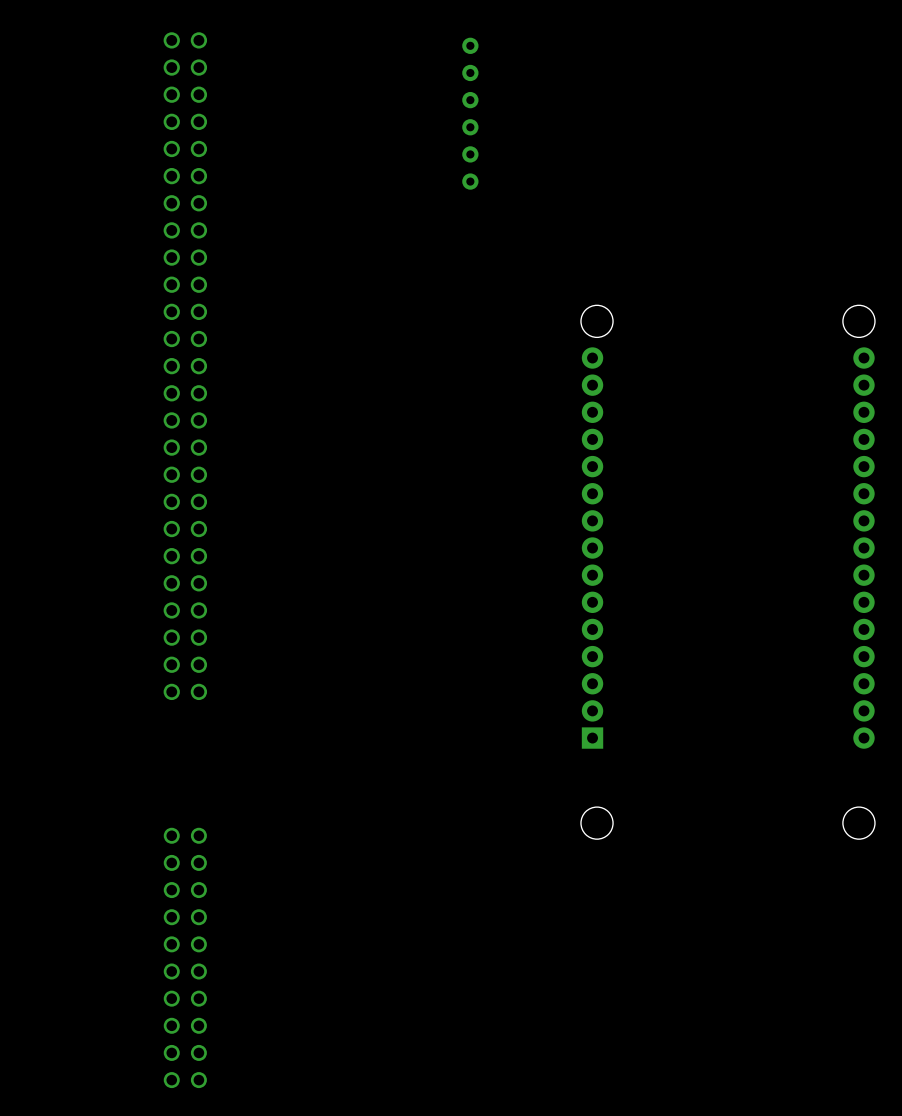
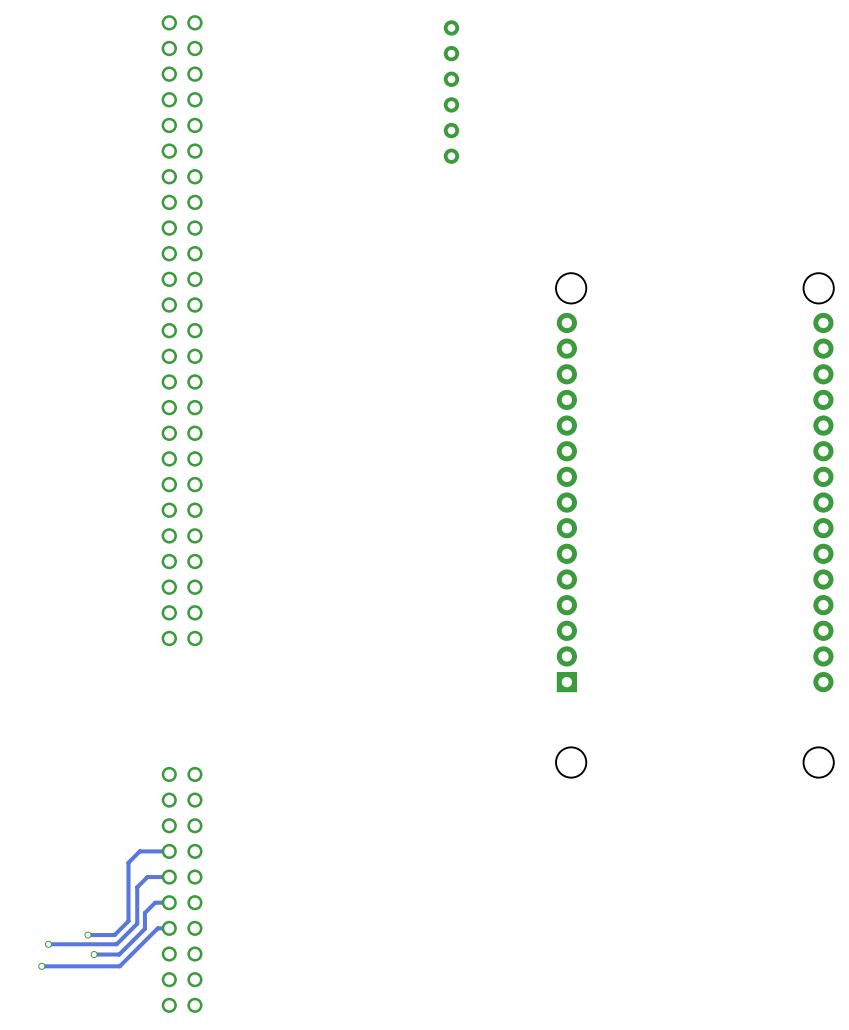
track: none -> (169, 851) (139, 851) (128, 862) (128, 921) (114, 935) (87, 935)
track: none -> (169, 877) (147, 877) (137, 887) (137, 923) (116, 944) (48, 944)
track: none -> (169, 902) (155, 902) (144, 912) (144, 928) (119, 954) (94, 954)
track: none -> (169, 928) (157, 928) (119, 966) (41, 966)
via: none -> (87, 935)
via: none -> (48, 944)
via: none -> (94, 954)
via: none -> (41, 966)

